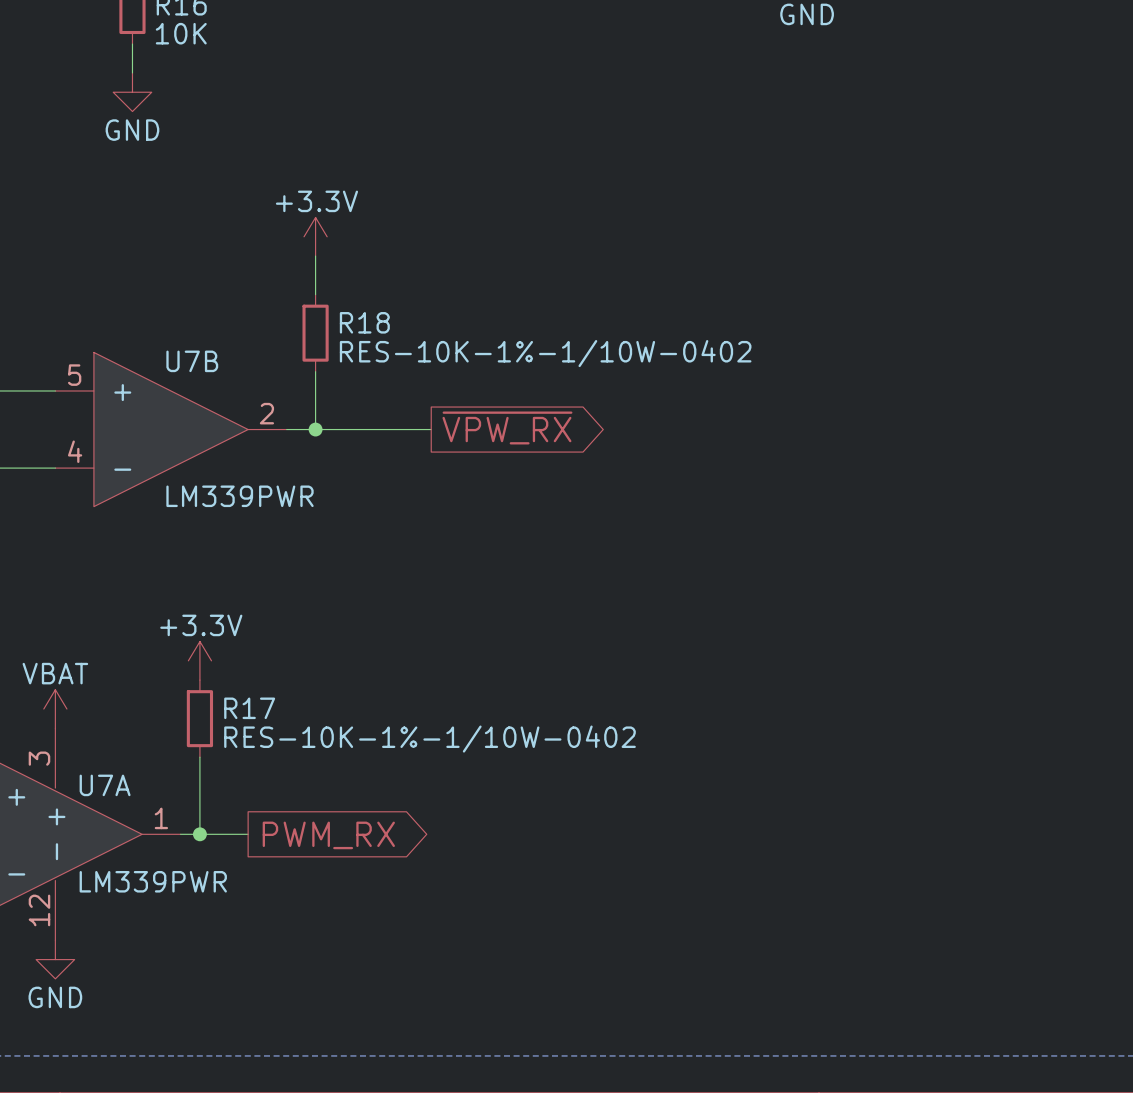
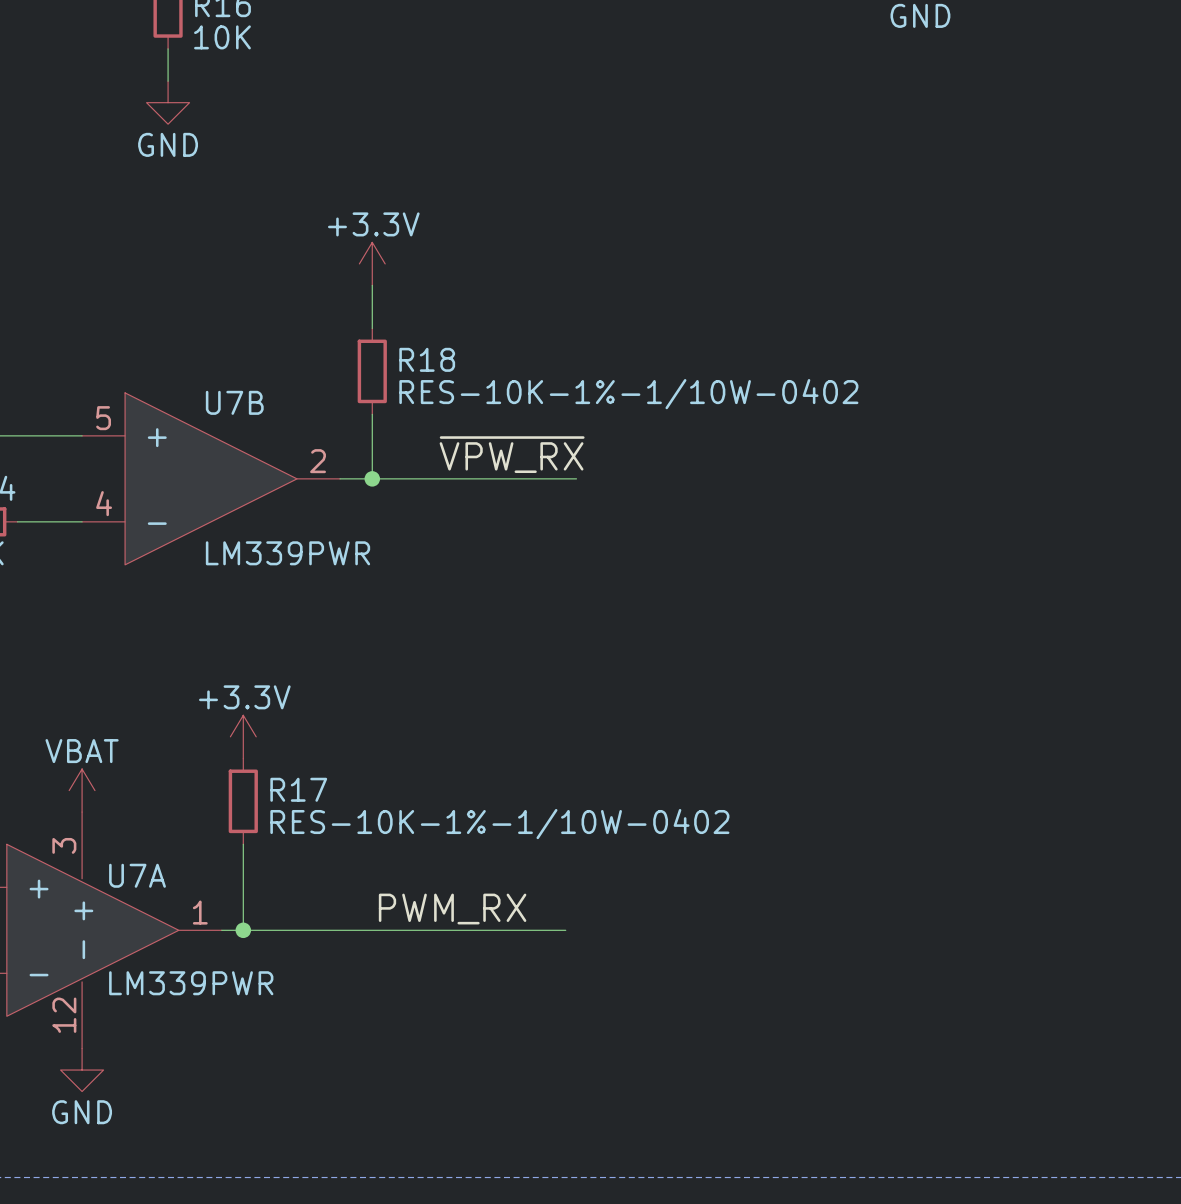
label: none -> ~{VPW_RX} (512, 454)
global label: ~{VPW_RX} (507, 427) -> none
wire: none -> (501, 478) (576, 478)
label: none -> PWM_RX (452, 909)
wire: none -> (297, 930) (565, 930)
global label: PWM_RX (328, 835) -> none

